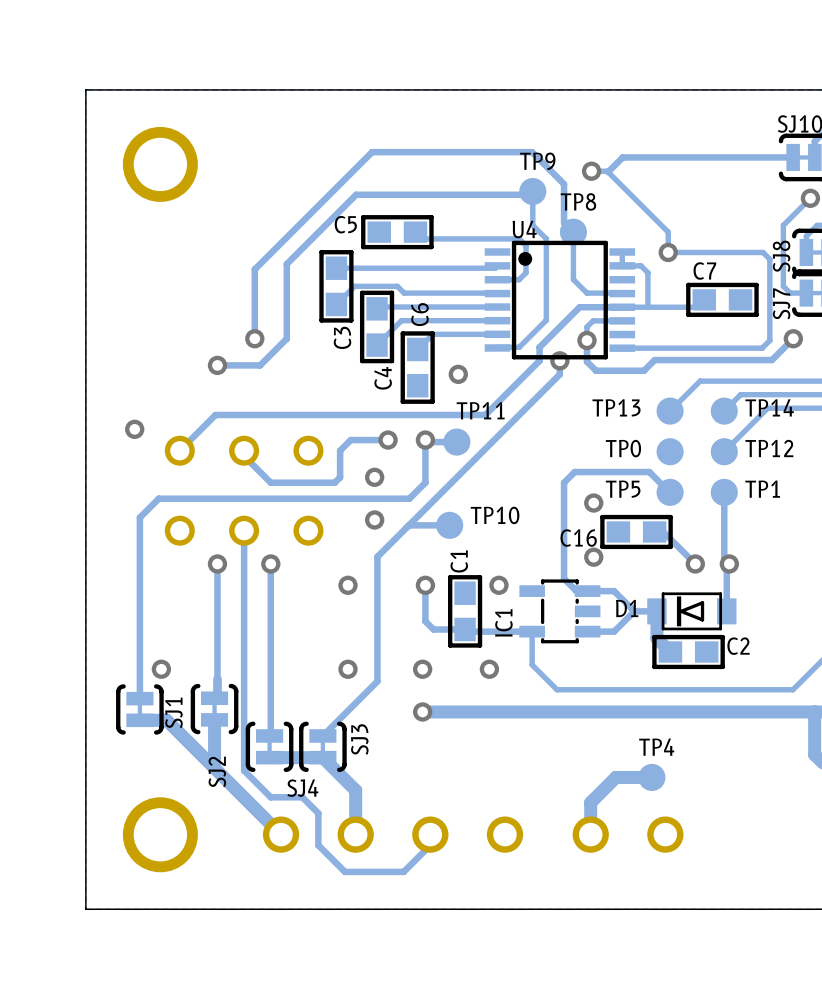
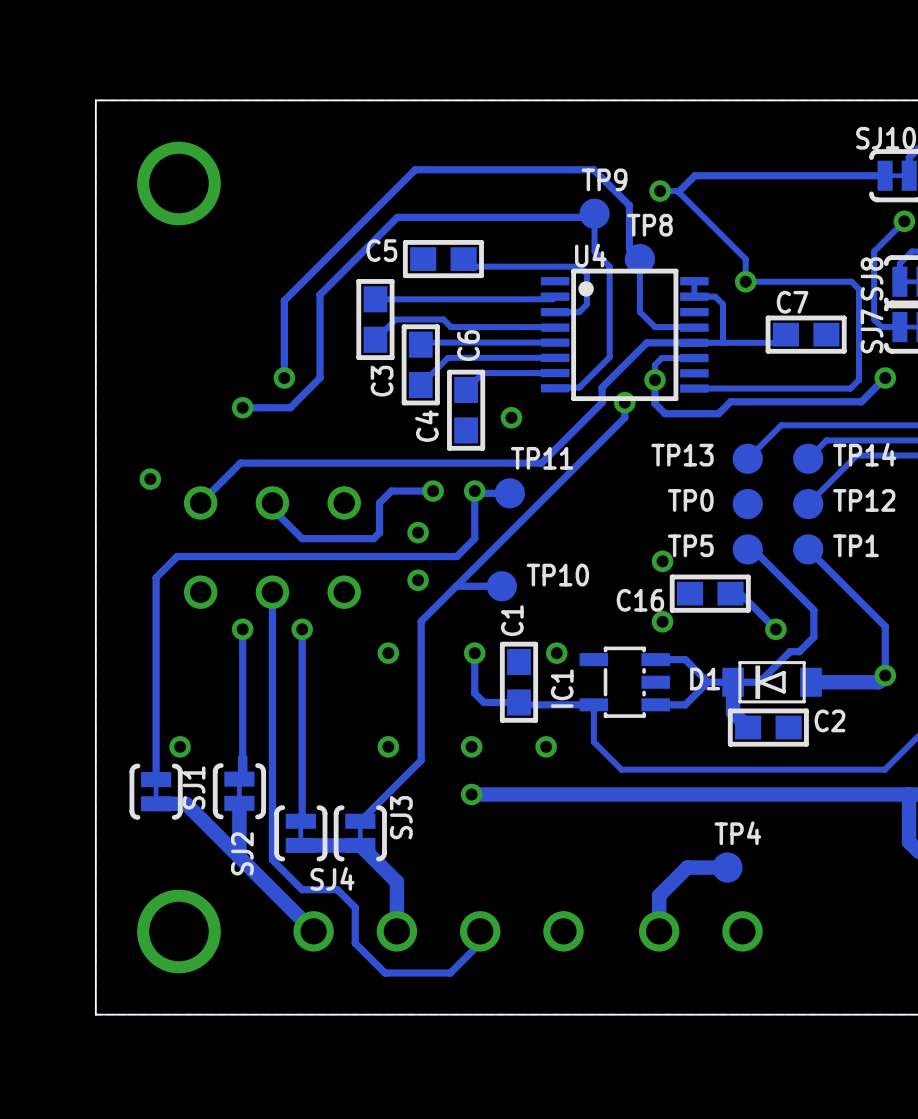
track: (670, 492) (649, 472) (574, 472) (564, 482) (564, 578) (576, 591) (587, 591) -> (747, 549) (753, 549) (813, 610) (813, 637) (799, 651) (790, 651) (759, 682) (733, 682)
track: (724, 492) (724, 558) (729, 563) (726, 566) (726, 611) -> (808, 549) (885, 626) (885, 675) (878, 682) (811, 682)
via position: (729, 563) -> (885, 675)

